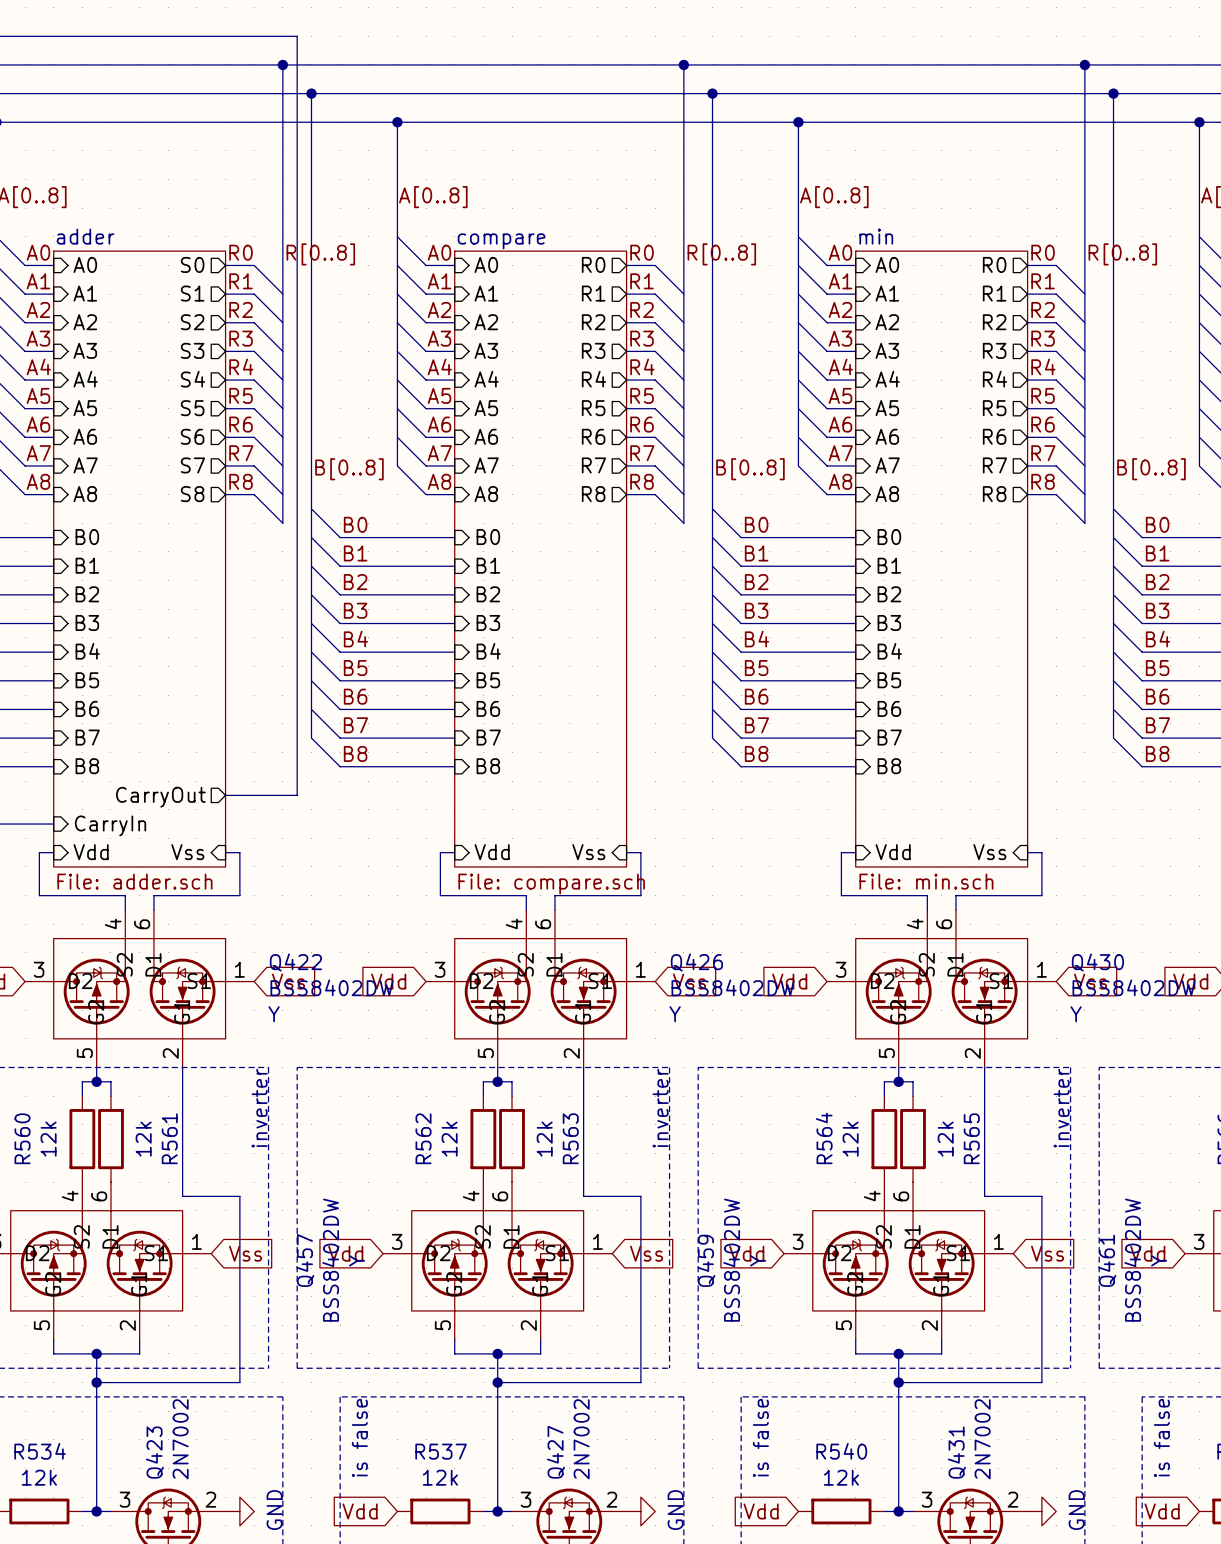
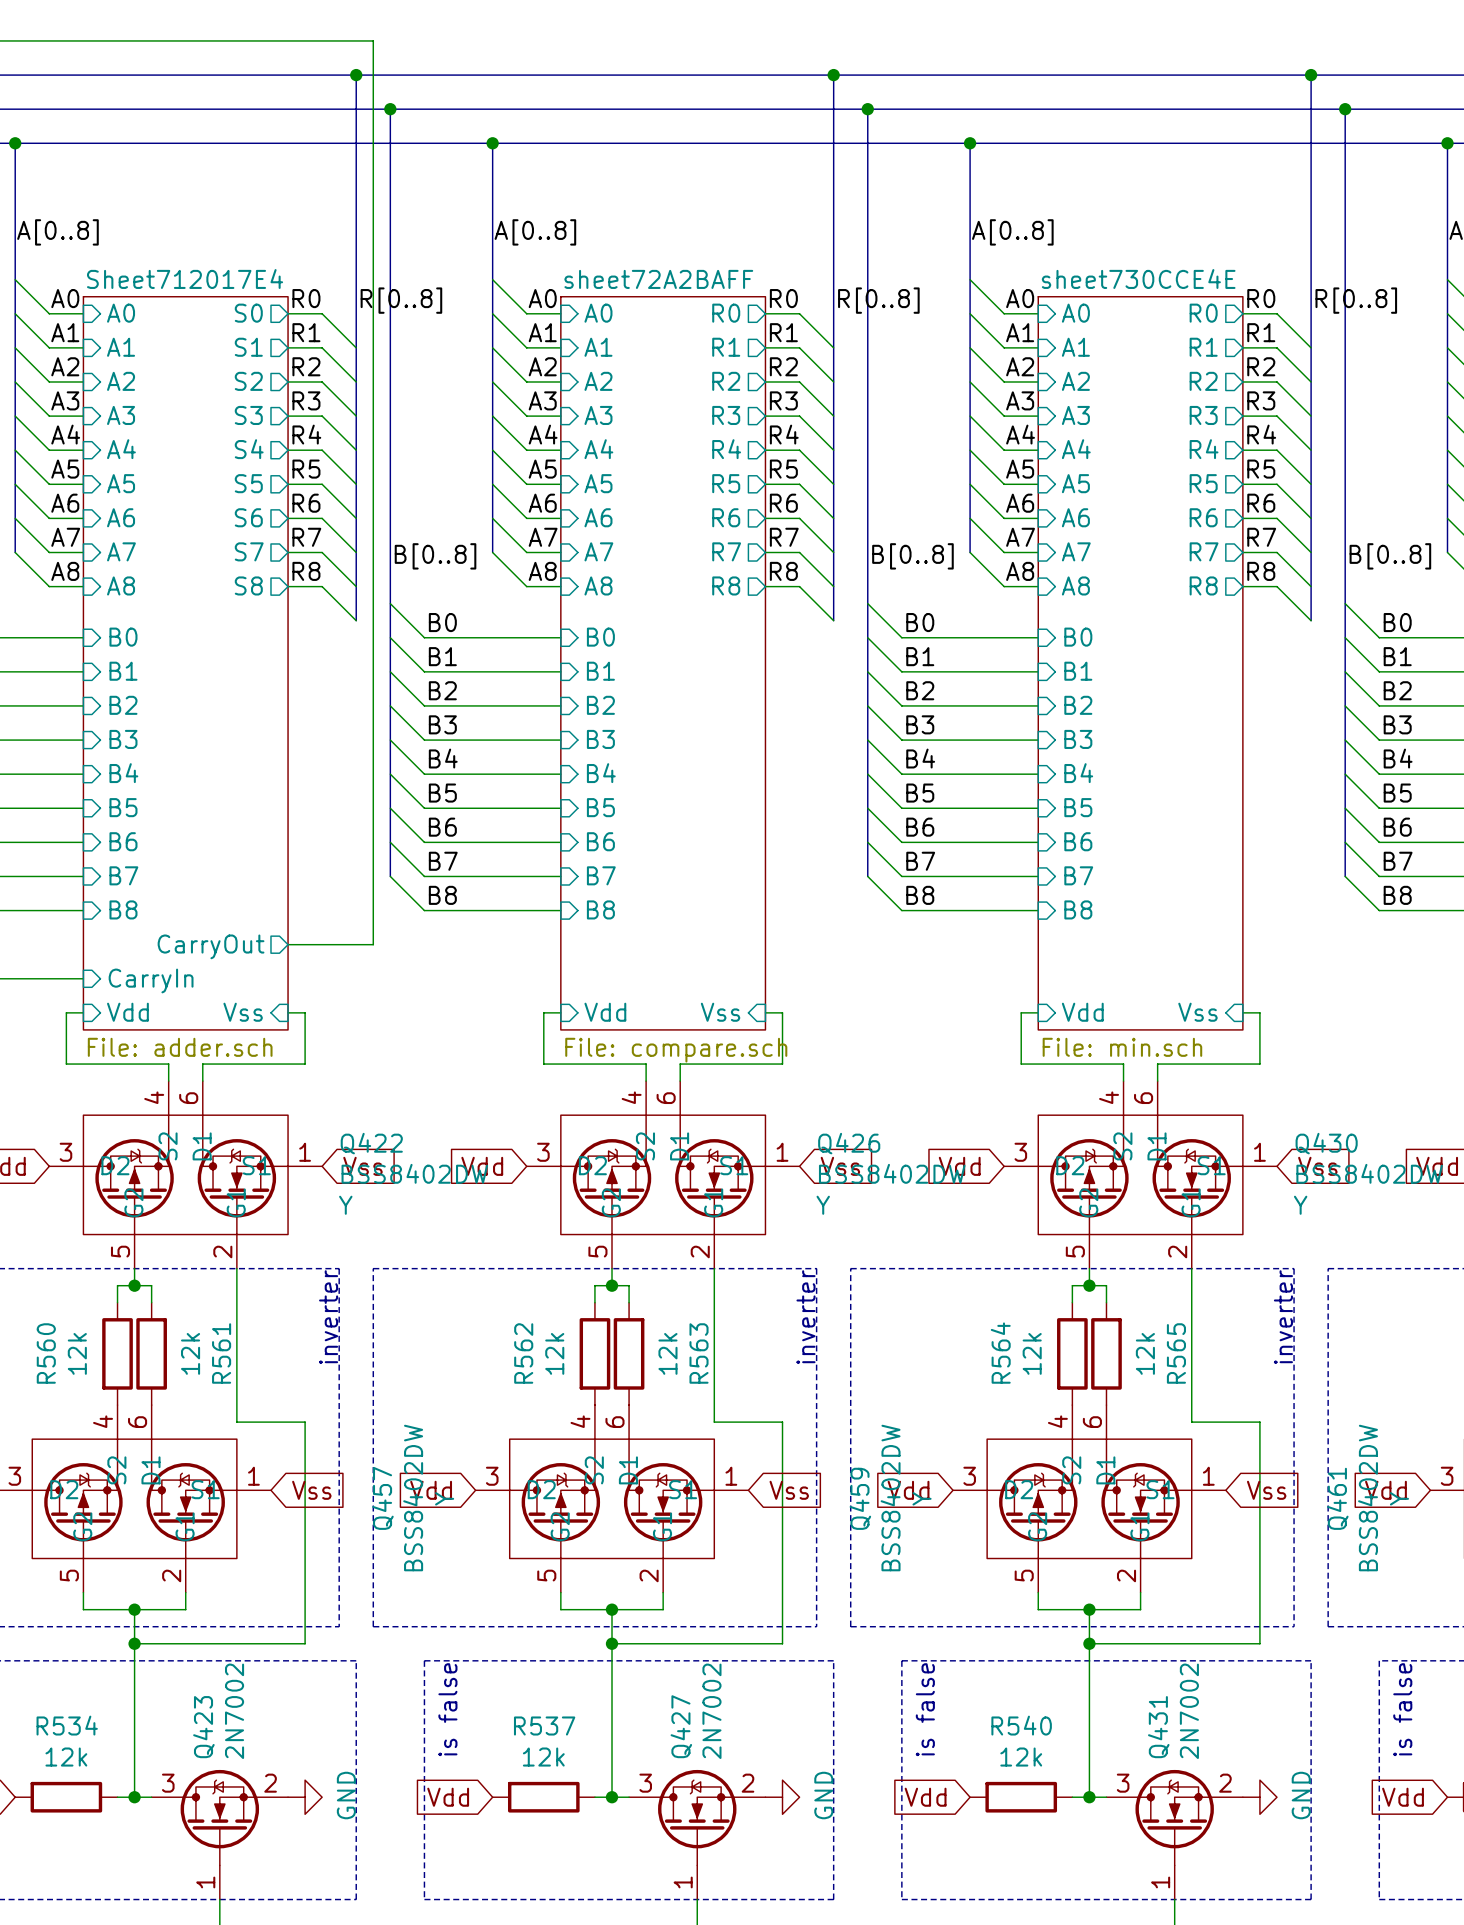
sheet adder name: adder (85, 236) -> Sheet712017E4 (185, 279)
sheet min name: min (876, 236) -> sheet730CCE4E (1138, 279)
sheet compare name: compare (501, 241) -> sheet72A2BAFF (658, 279)

